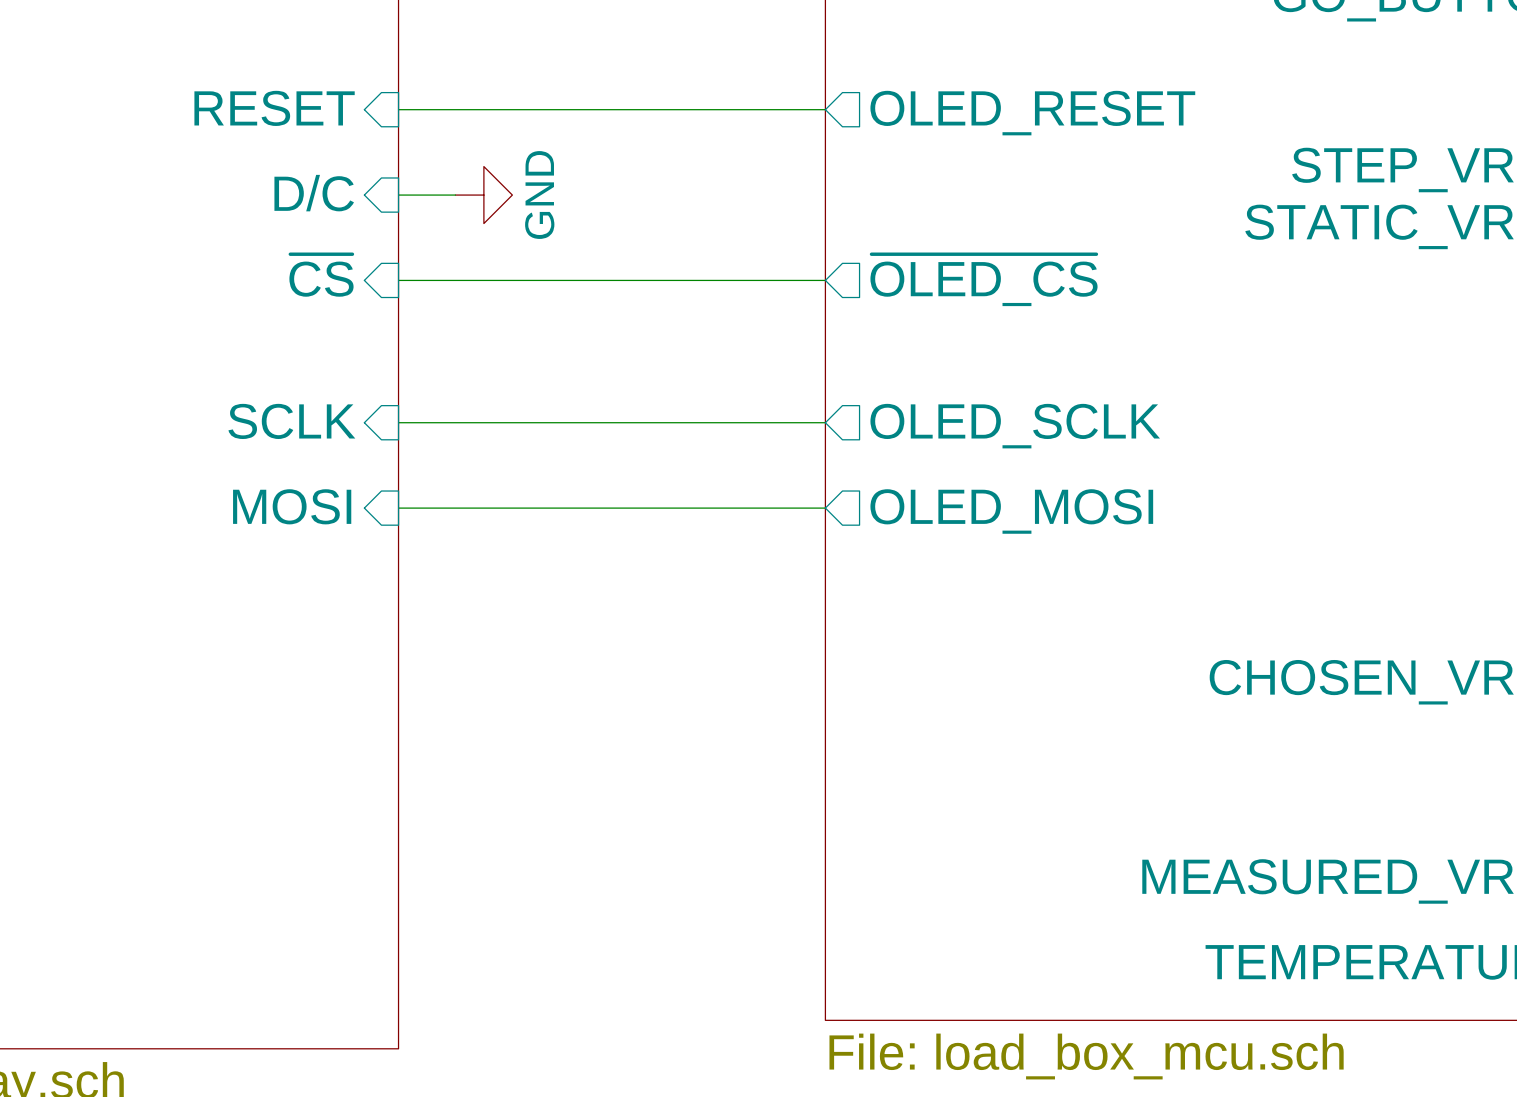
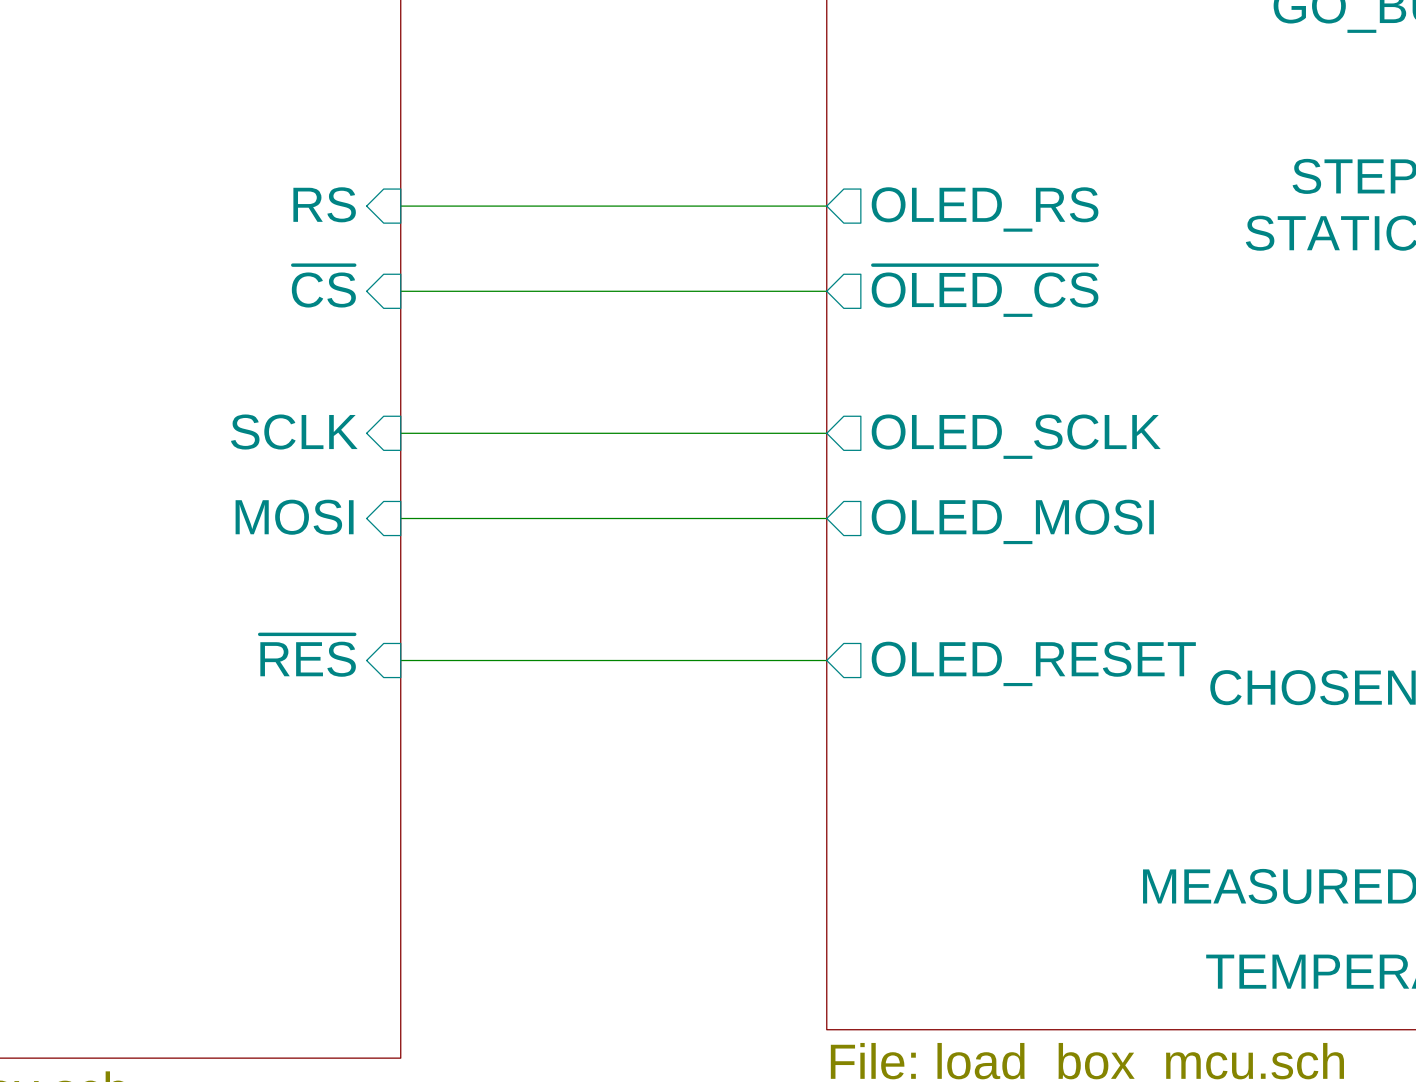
sheet pin: RESET (274, 108) -> none
wire: (398, 109) (825, 109) -> (400, 660) (826, 660)
sheet pin position: OLED_RESET (1032, 113) -> OLED_RESET (1033, 663)
sheet pin: D/C (314, 193) -> RS (324, 204)
wire: none -> (457, 206) (826, 206)
power symbol: GND (483, 195) -> none
sheet pin: none -> OLED_RS (985, 209)
sheet pin: none -> ~{RES} (307, 655)

